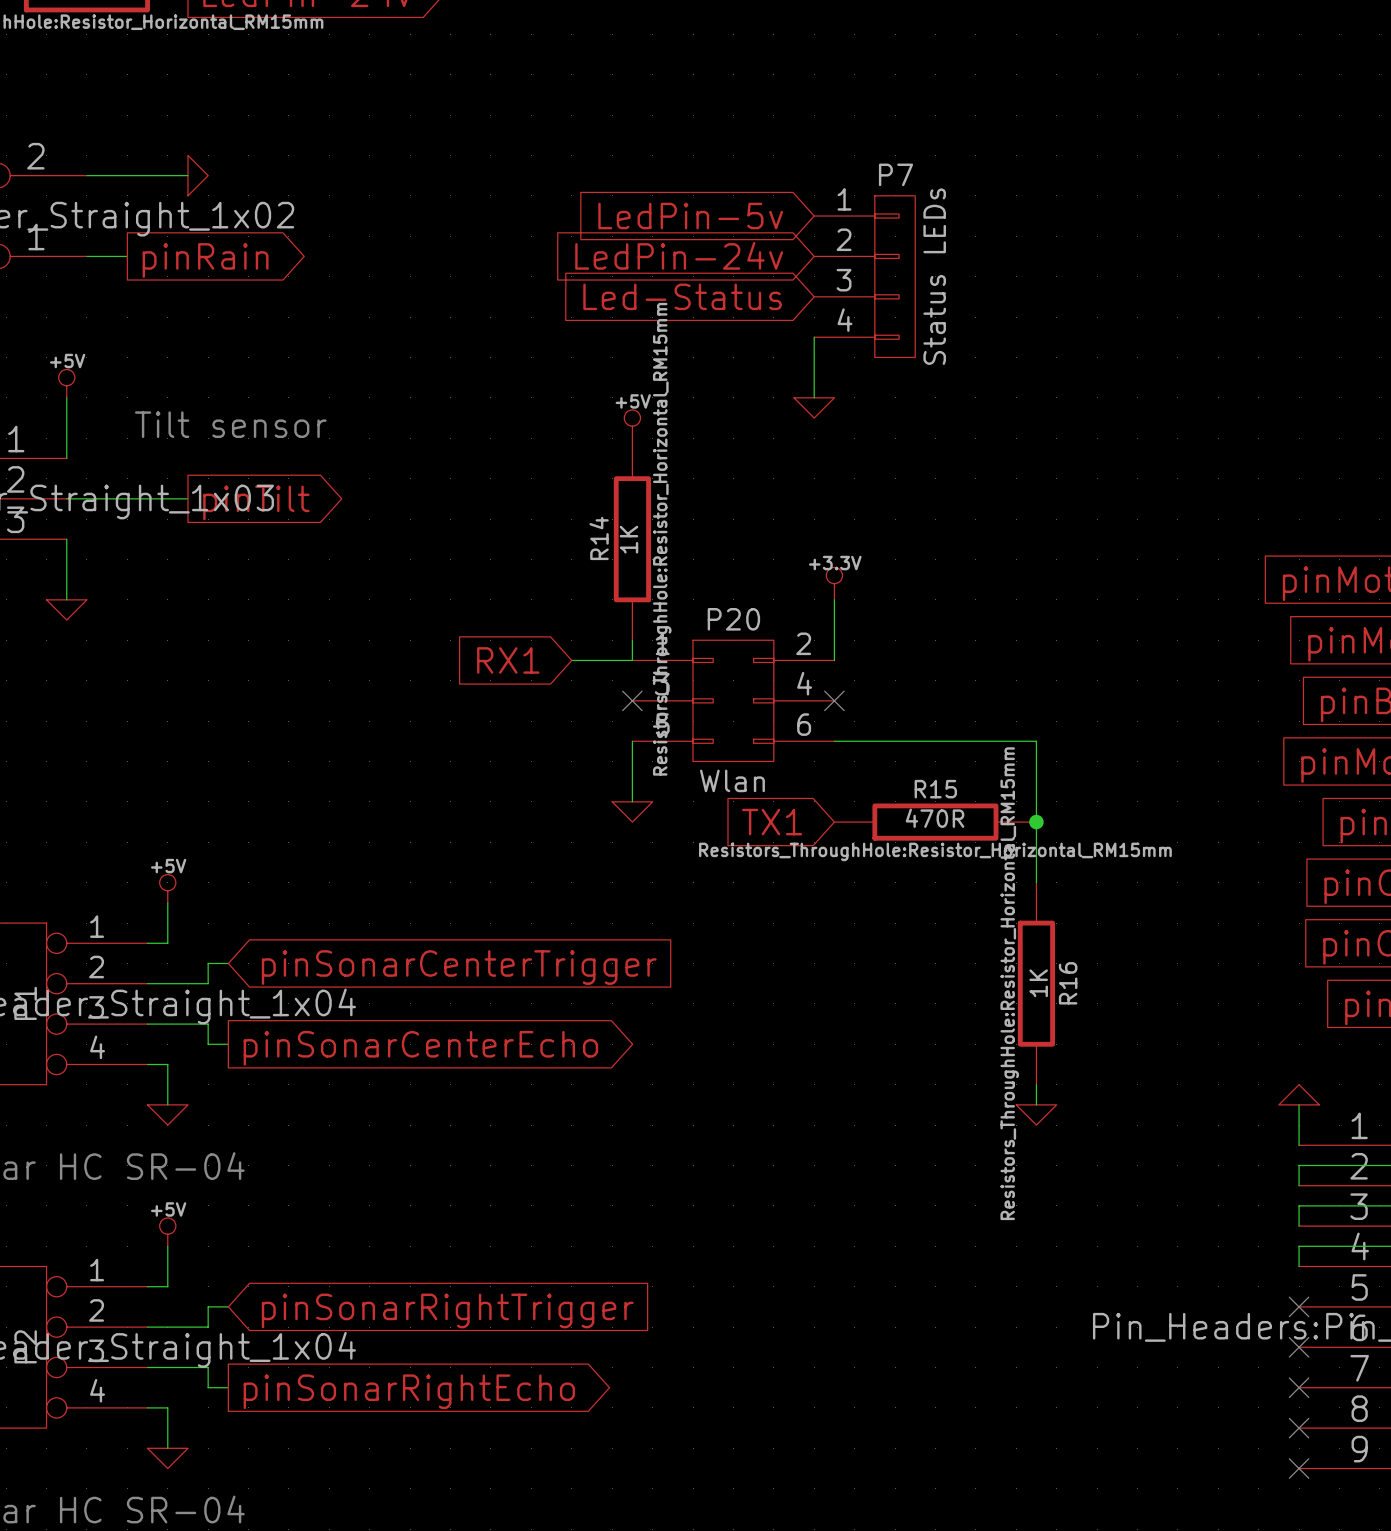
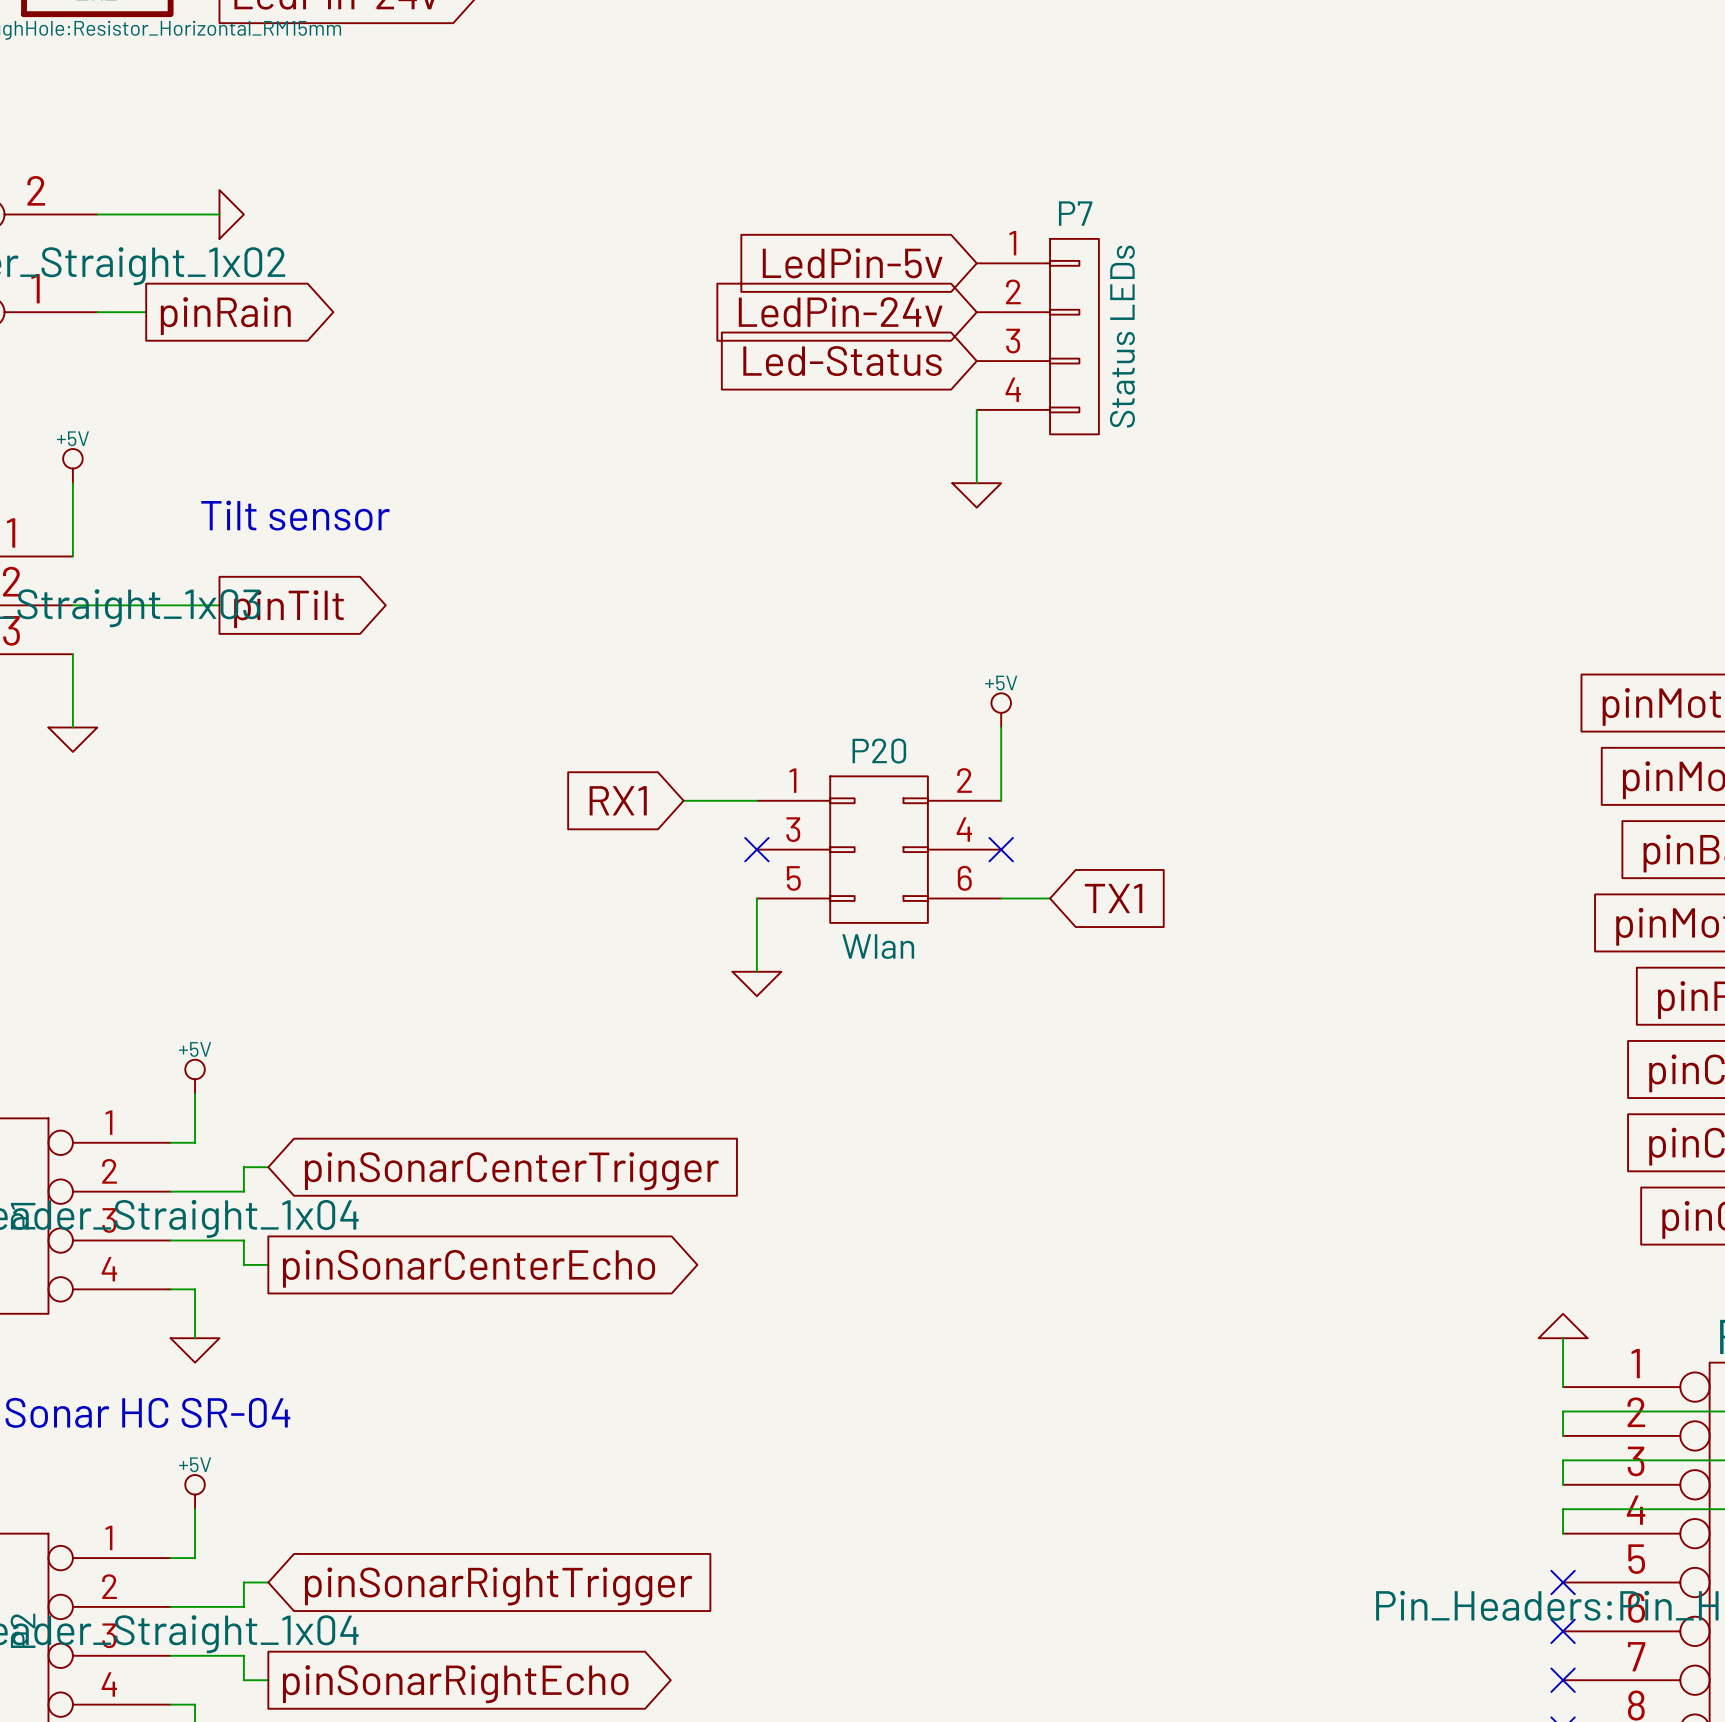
power symbol: +5V (632, 424) -> none
R14: 1K (632, 539) -> none
power symbol: +3.3V (834, 583) -> +5V (1001, 710)
wire: (632, 640) (632, 660) -> none
wire: (874, 741) (1036, 741) (1036, 882) -> none
global label rotation: 0° (772, 822) -> 180° (1113, 898)
global label position: TX1 (772, 822) -> TX1 (1113, 898)
R15: 470R (935, 822) -> none
junction: (1036, 822) -> none
R16: 1K (1036, 983) -> none
wire: (1036, 1084) (1036, 1104) -> none
power symbol: (1036, 1114) -> none

